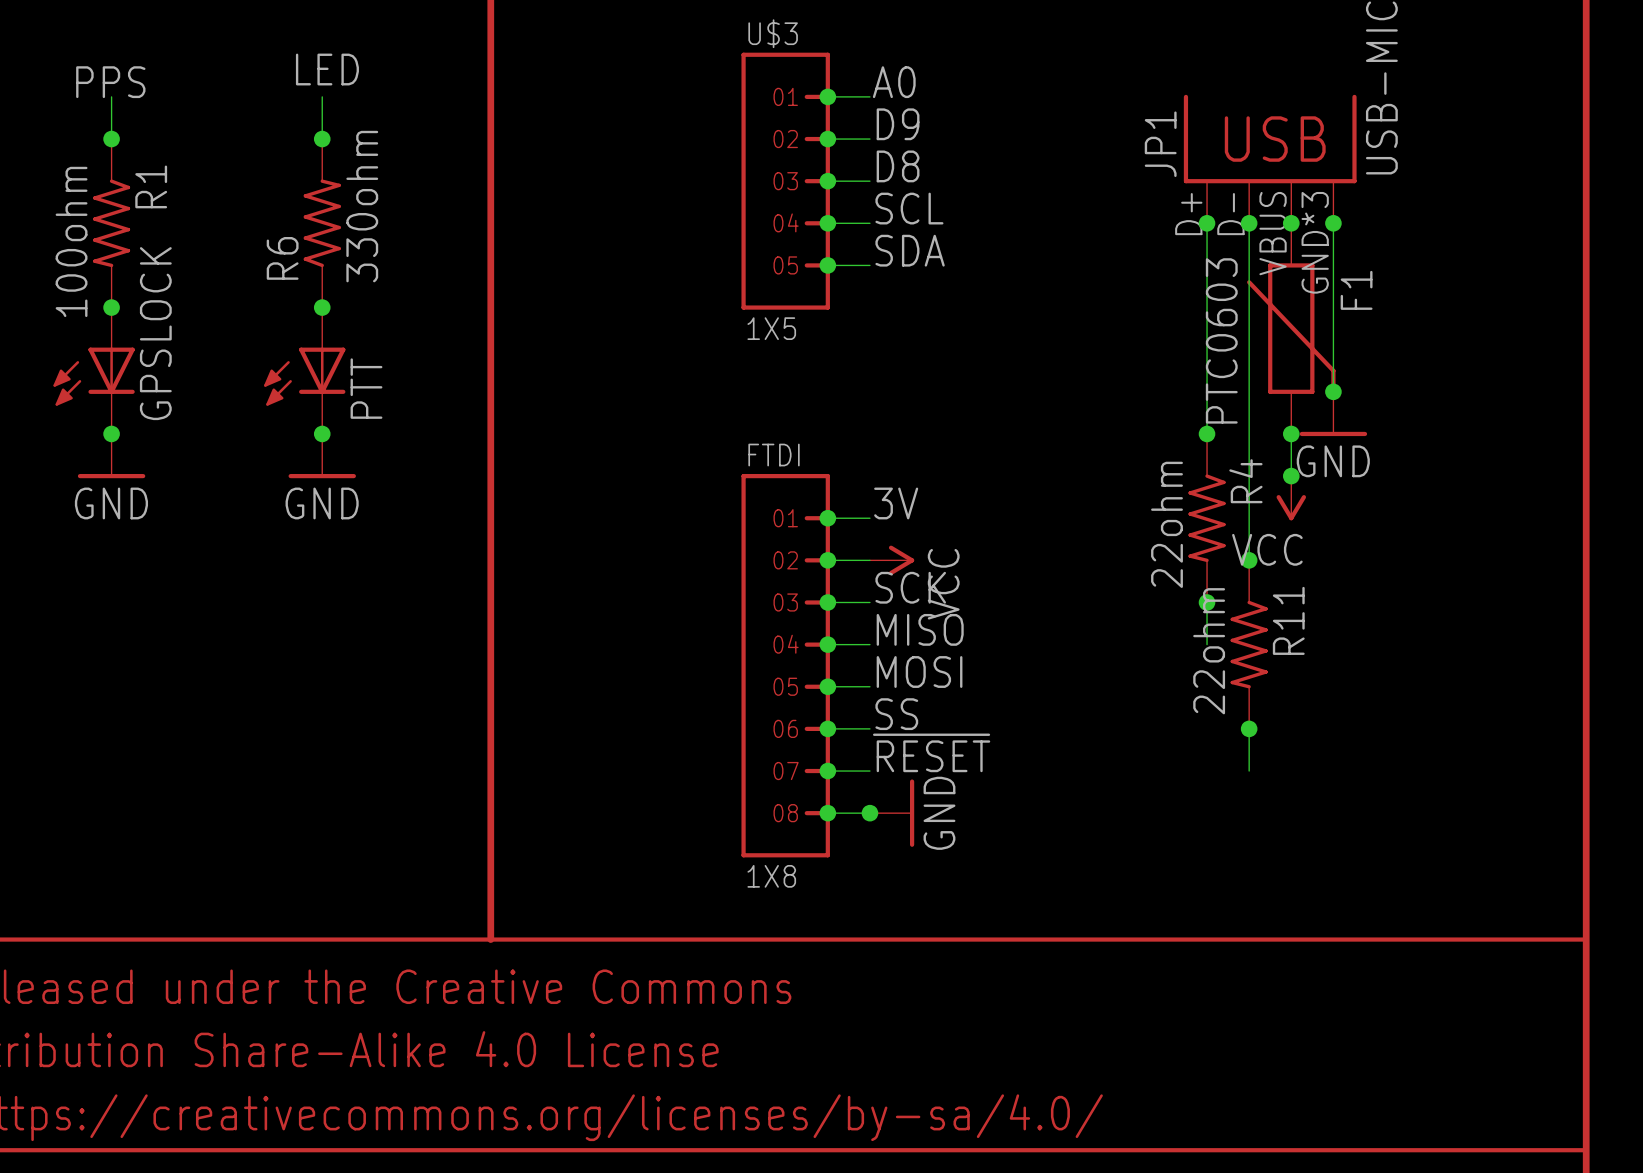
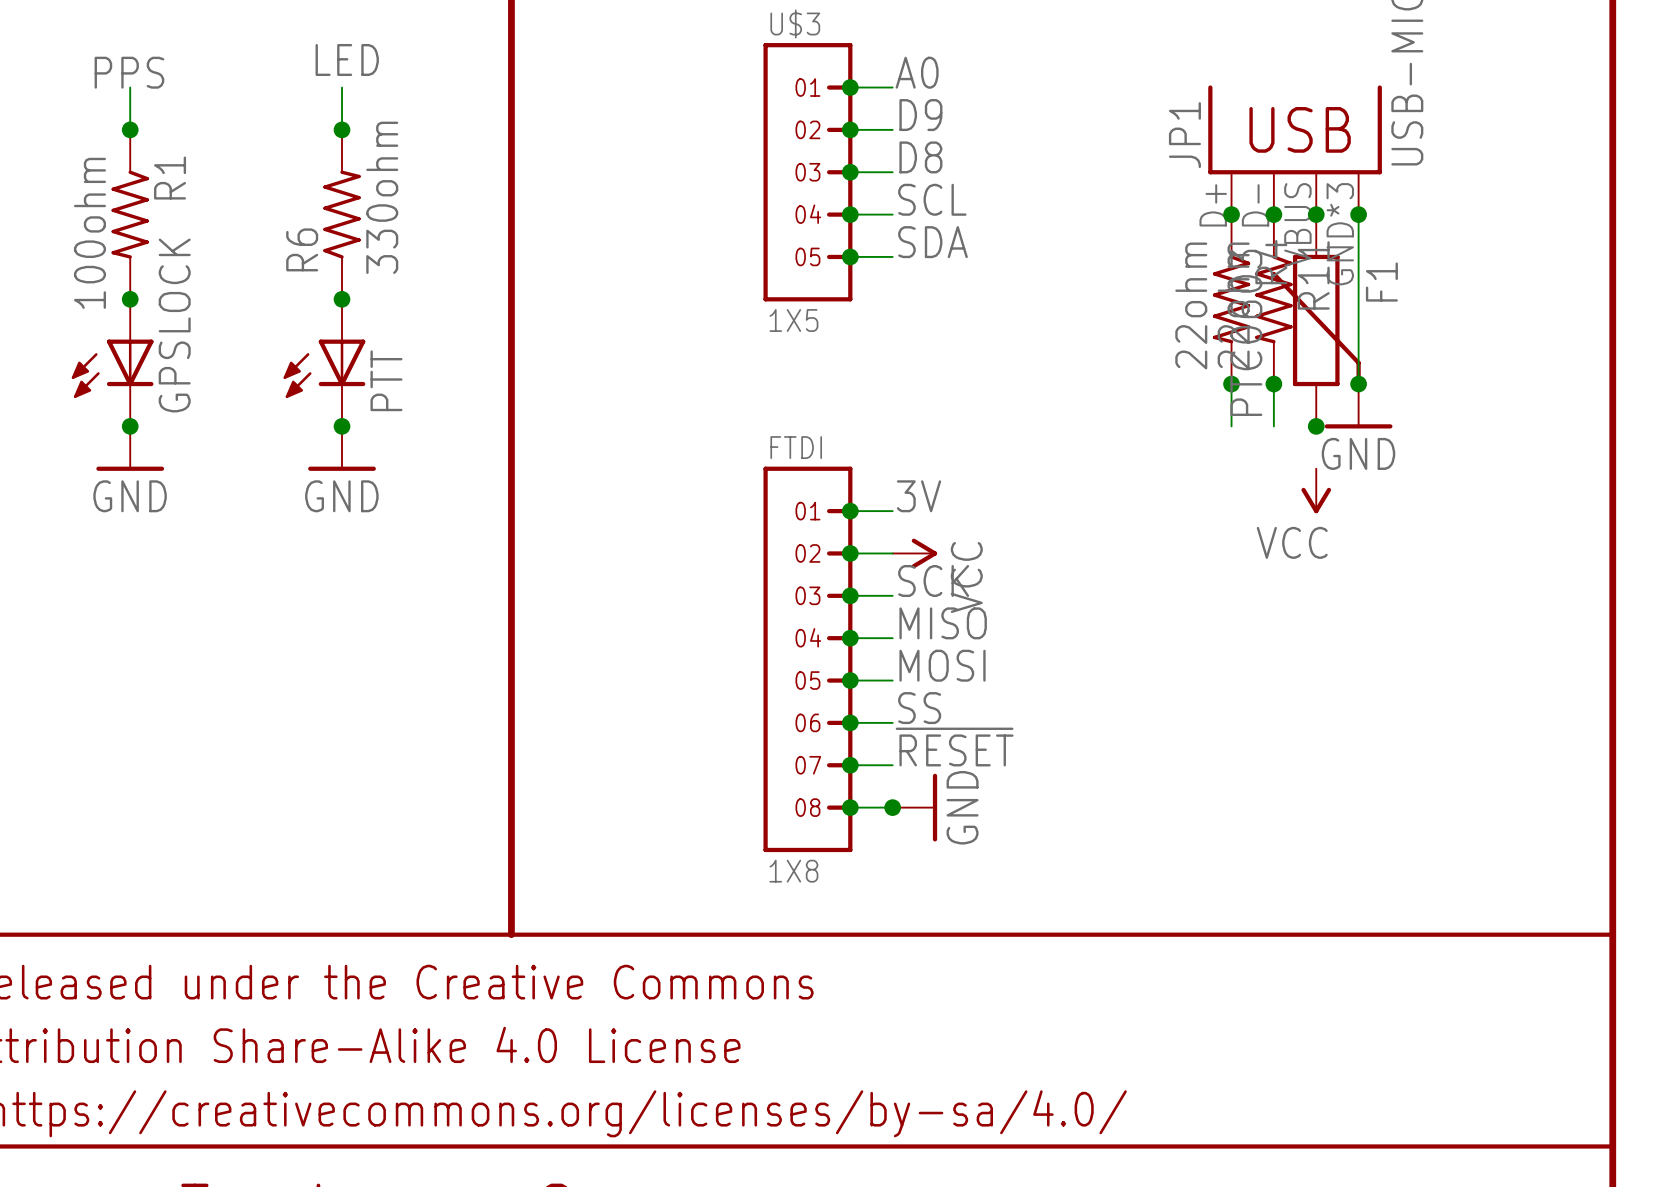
junction: none -> (1231, 384)
junction: none -> (1273, 384)
junction: (1207, 433) -> none
wire: (1249, 433) (1249, 560) -> none
wire: (1291, 433) (1291, 476) -> none
junction: (1291, 476) -> none
R4 position: (1207, 518) -> (1231, 299)
junction: (1249, 560) -> none
wire: (1207, 602) (1207, 644) -> none
junction: (1207, 602) -> none
R11 position: (1249, 644) -> (1273, 299)
wire: (1249, 728) (1249, 771) -> none
junction: (1249, 728) -> none

